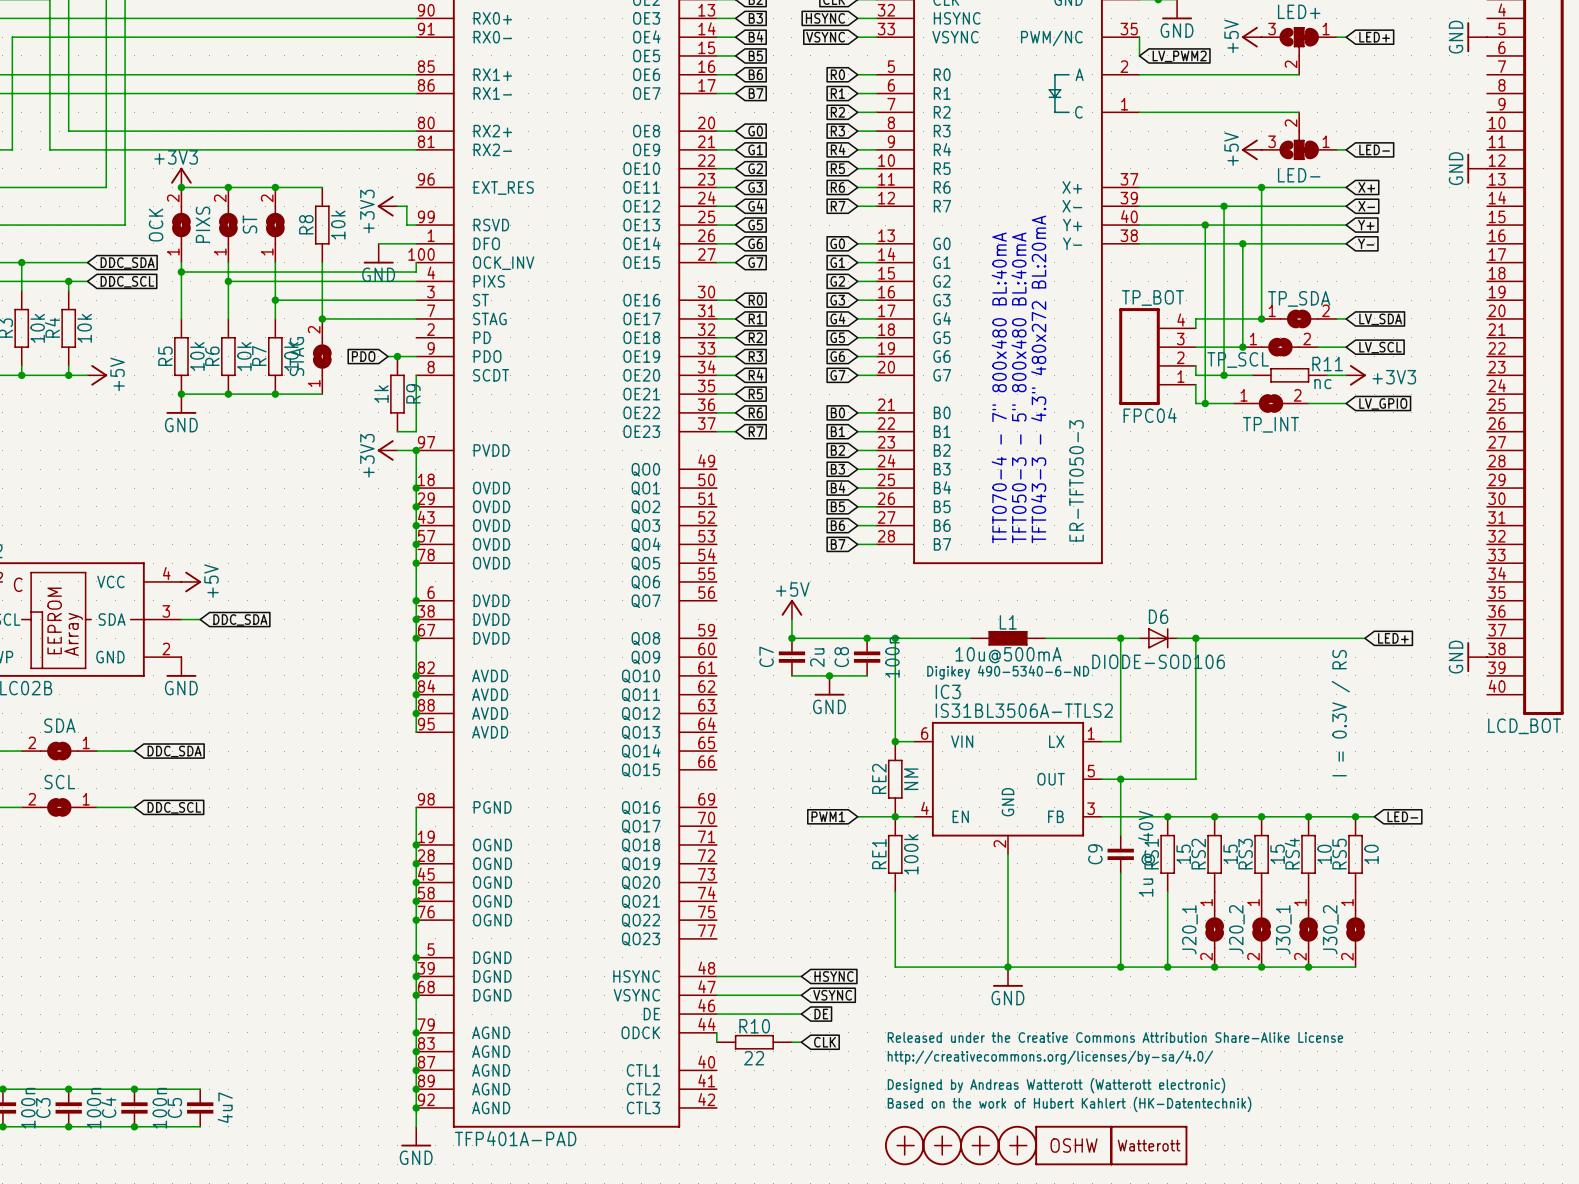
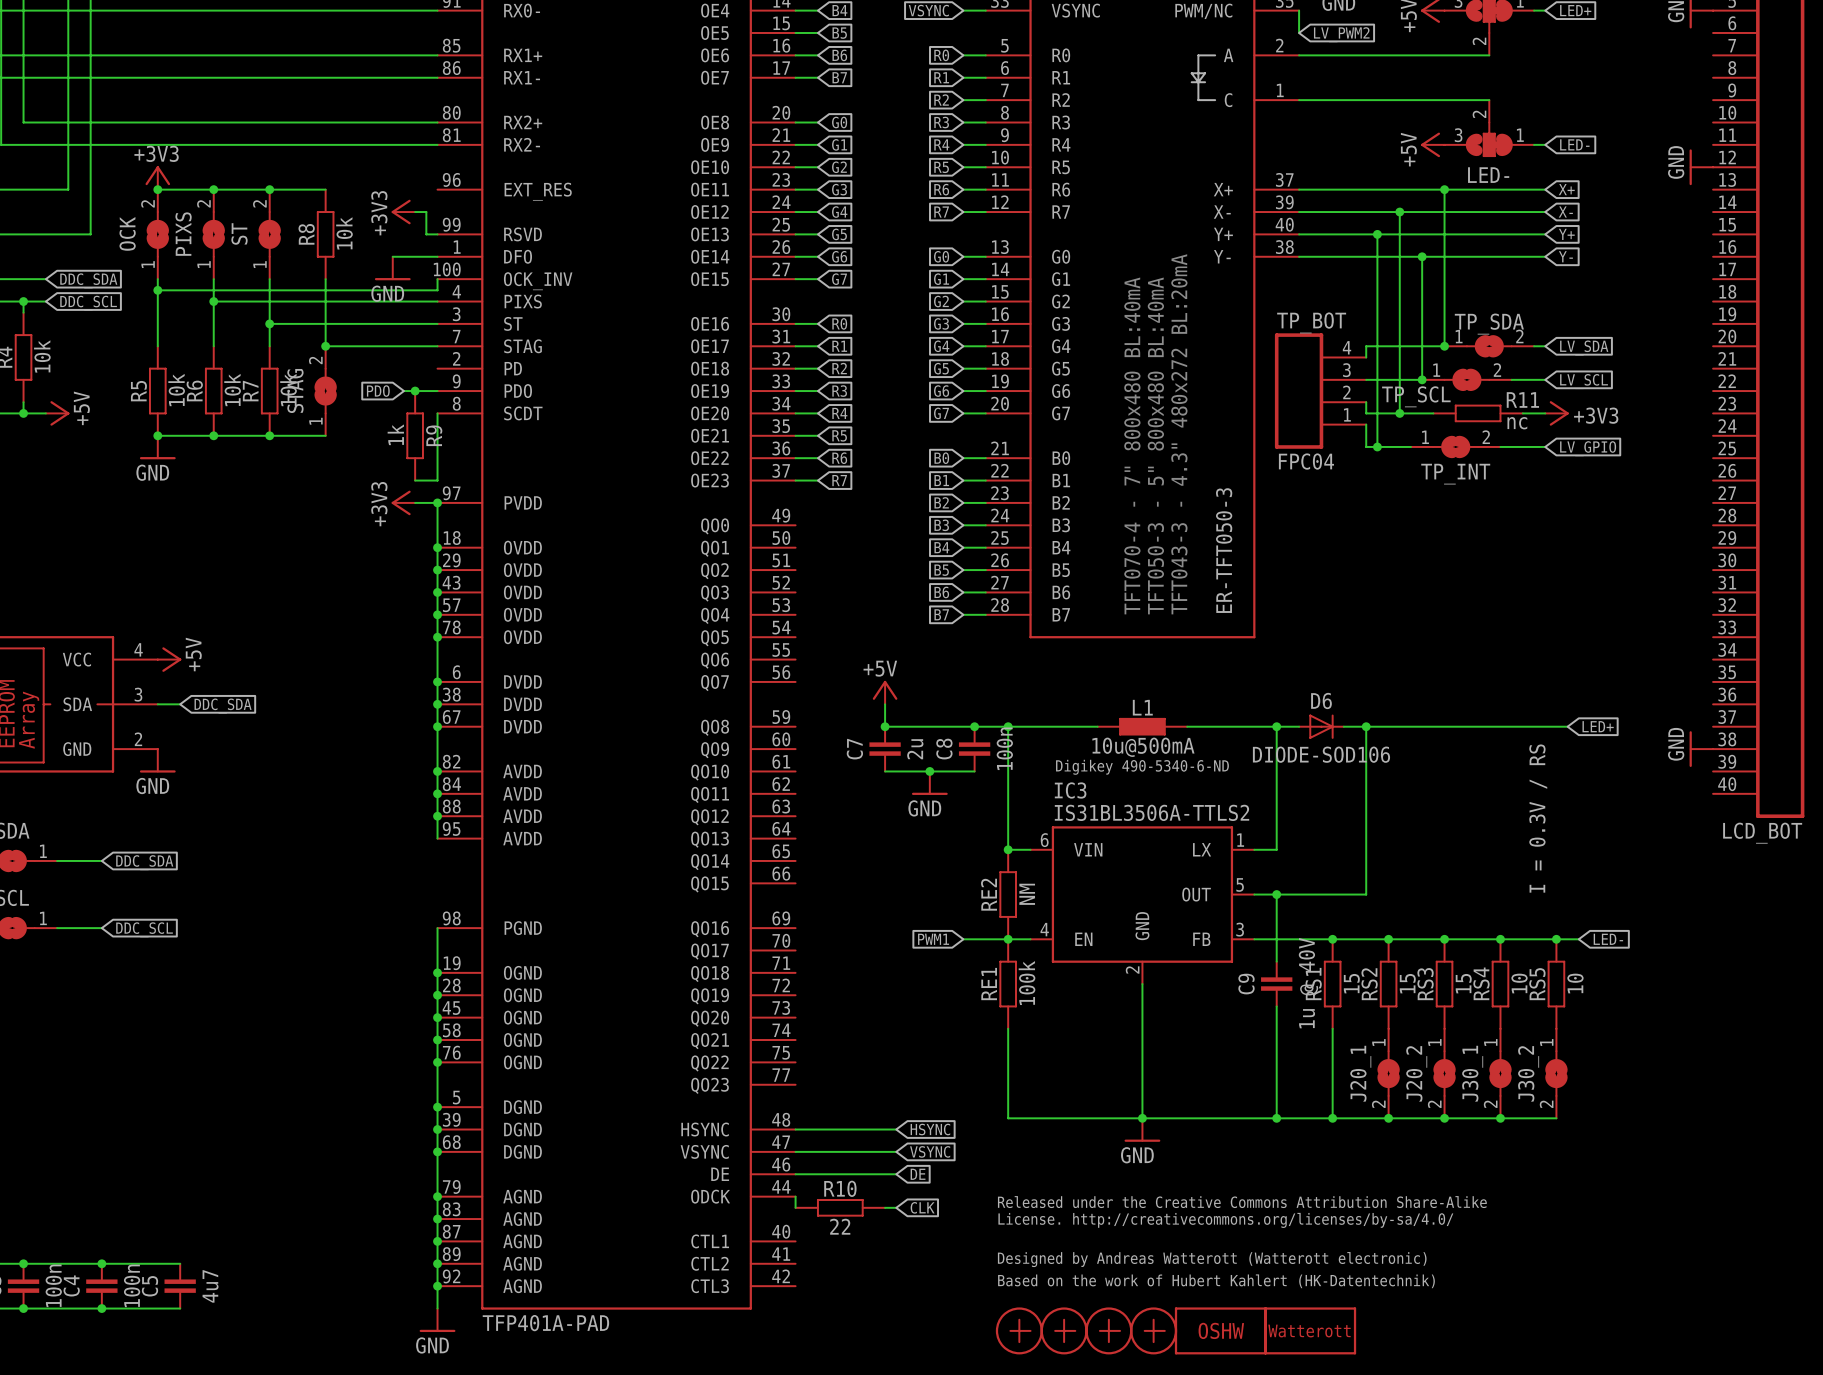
text: Released under the Creative Commons Attribution Share-Alike License (1115, 1037) -> License. http://creativecommons.org/licenses/by-sa/4.0/ (1225, 1220)
text: http://creativecommons.org/licenses/by-sa/4.0/ (1050, 1057) -> none

